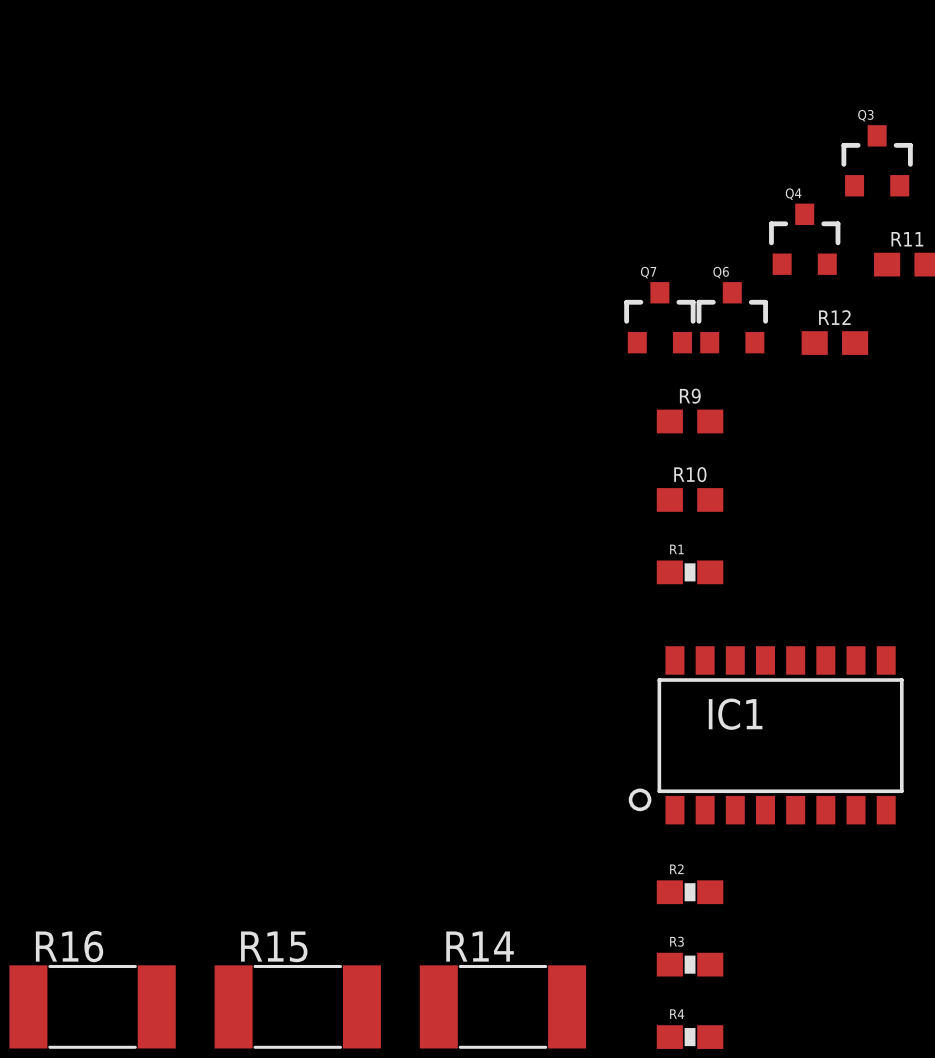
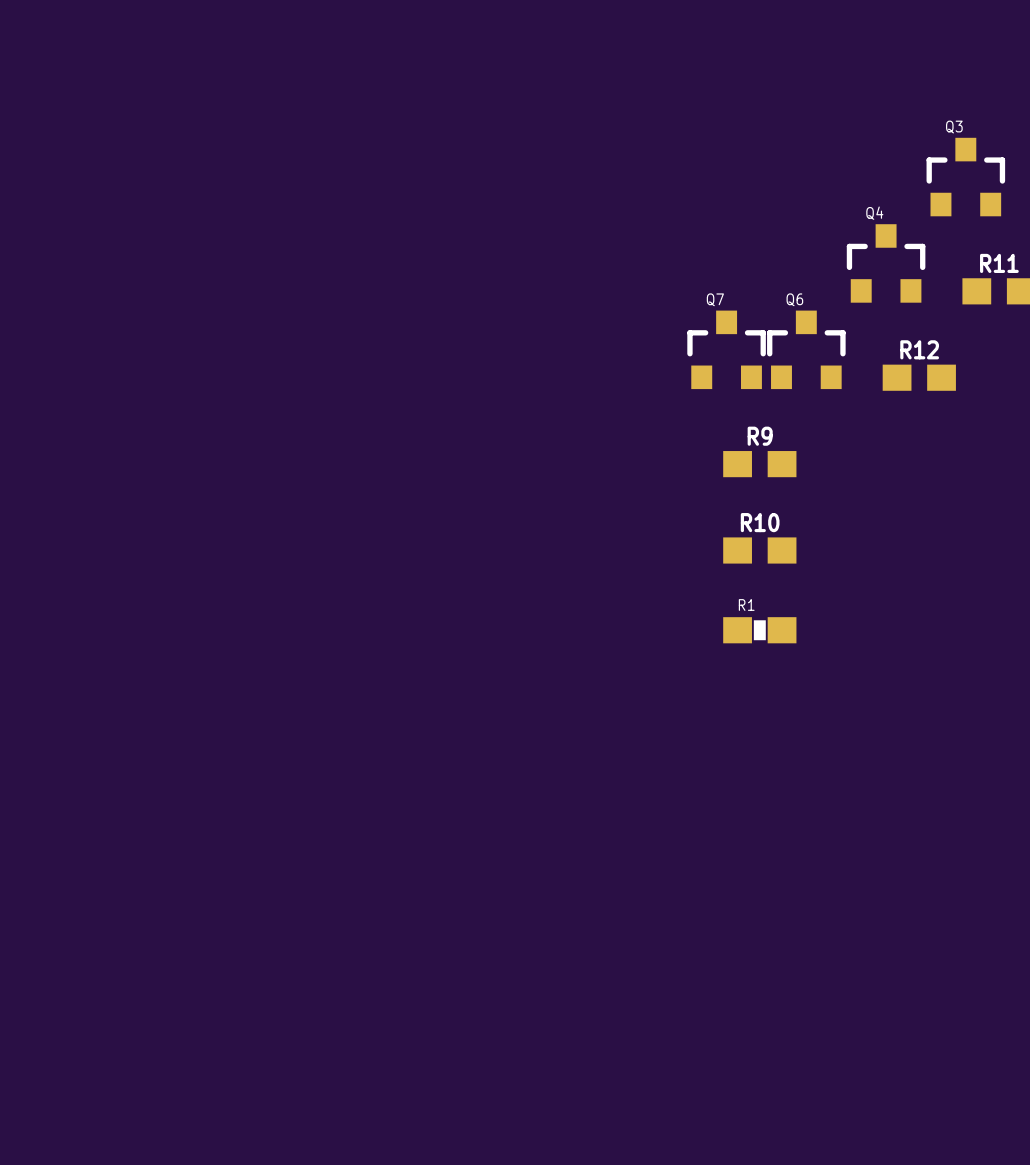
IC1: (766, 735) -> none
R2: (690, 892) -> none
R3: (690, 964) -> none
R16: (92, 1006) -> none
R15: (297, 1006) -> none
R14: (502, 1006) -> none
R4: (690, 1037) -> none

